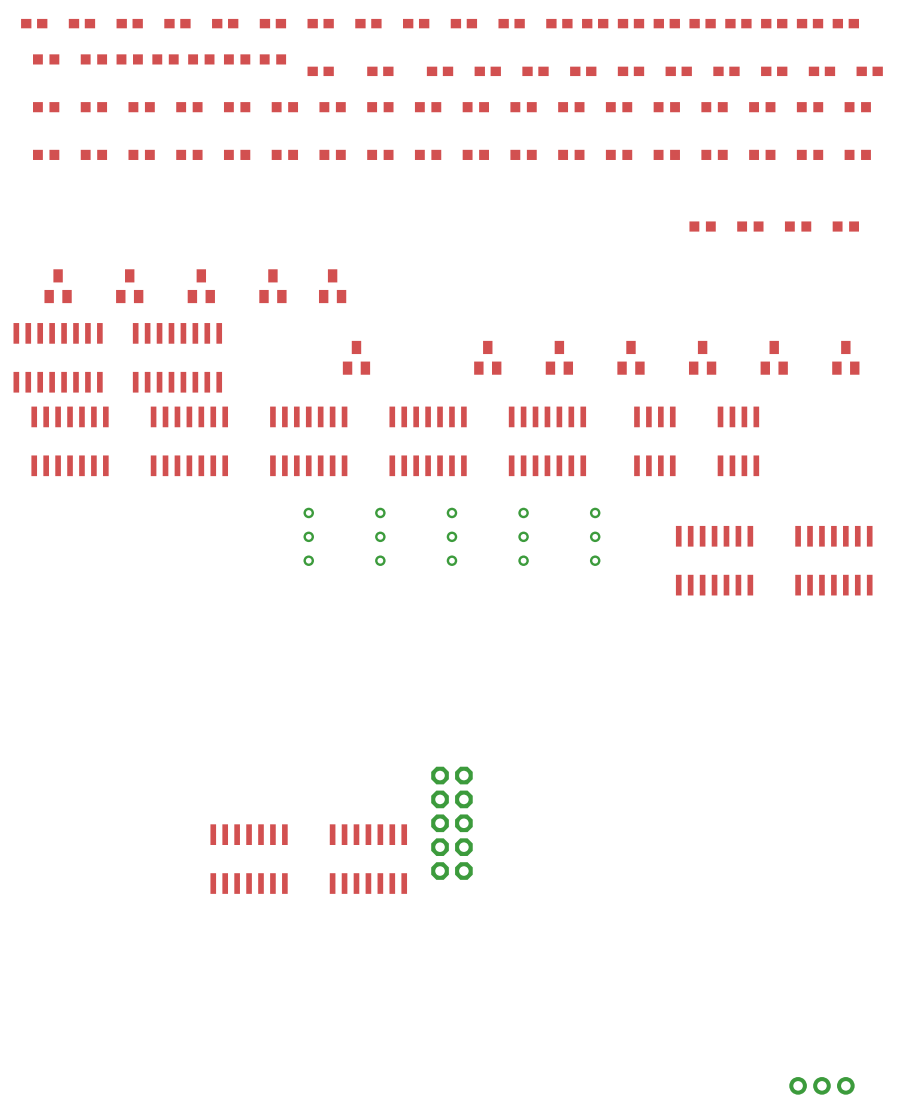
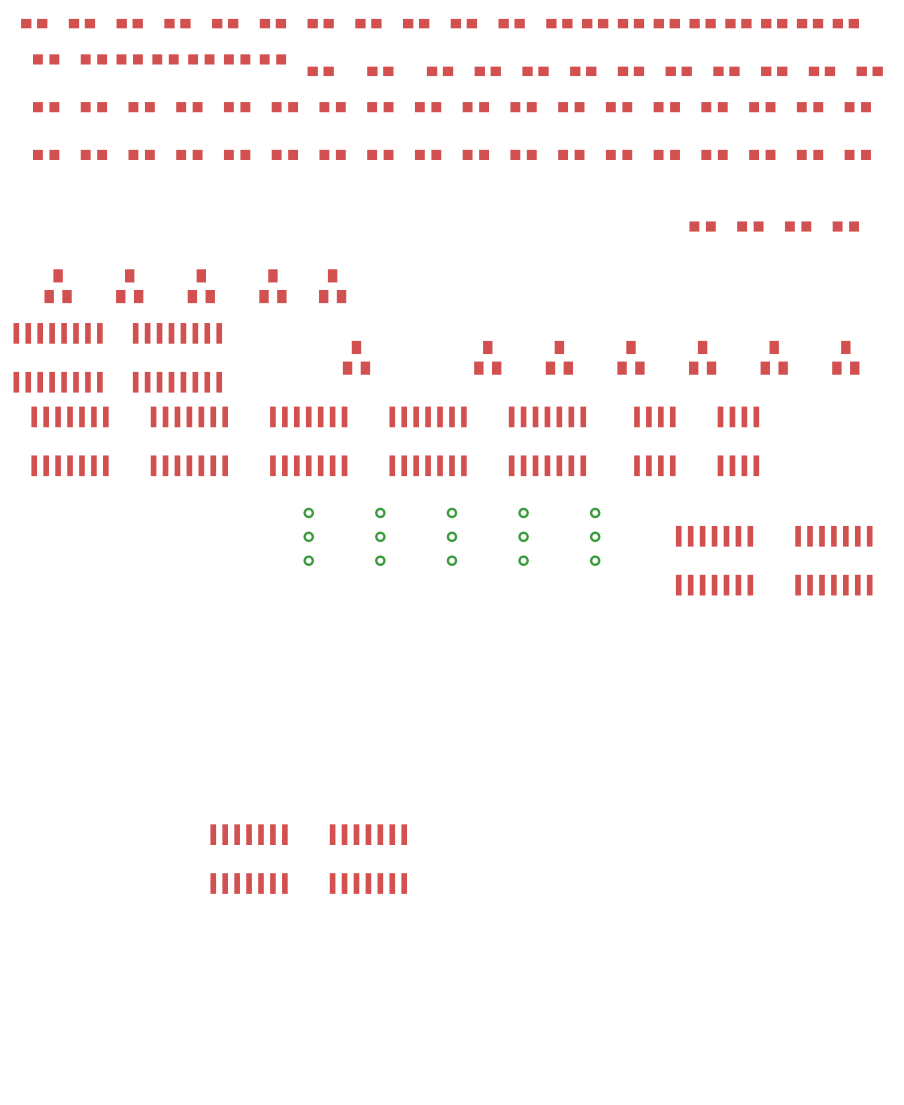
part: (451, 823) -> none
part: (821, 1085) -> none

